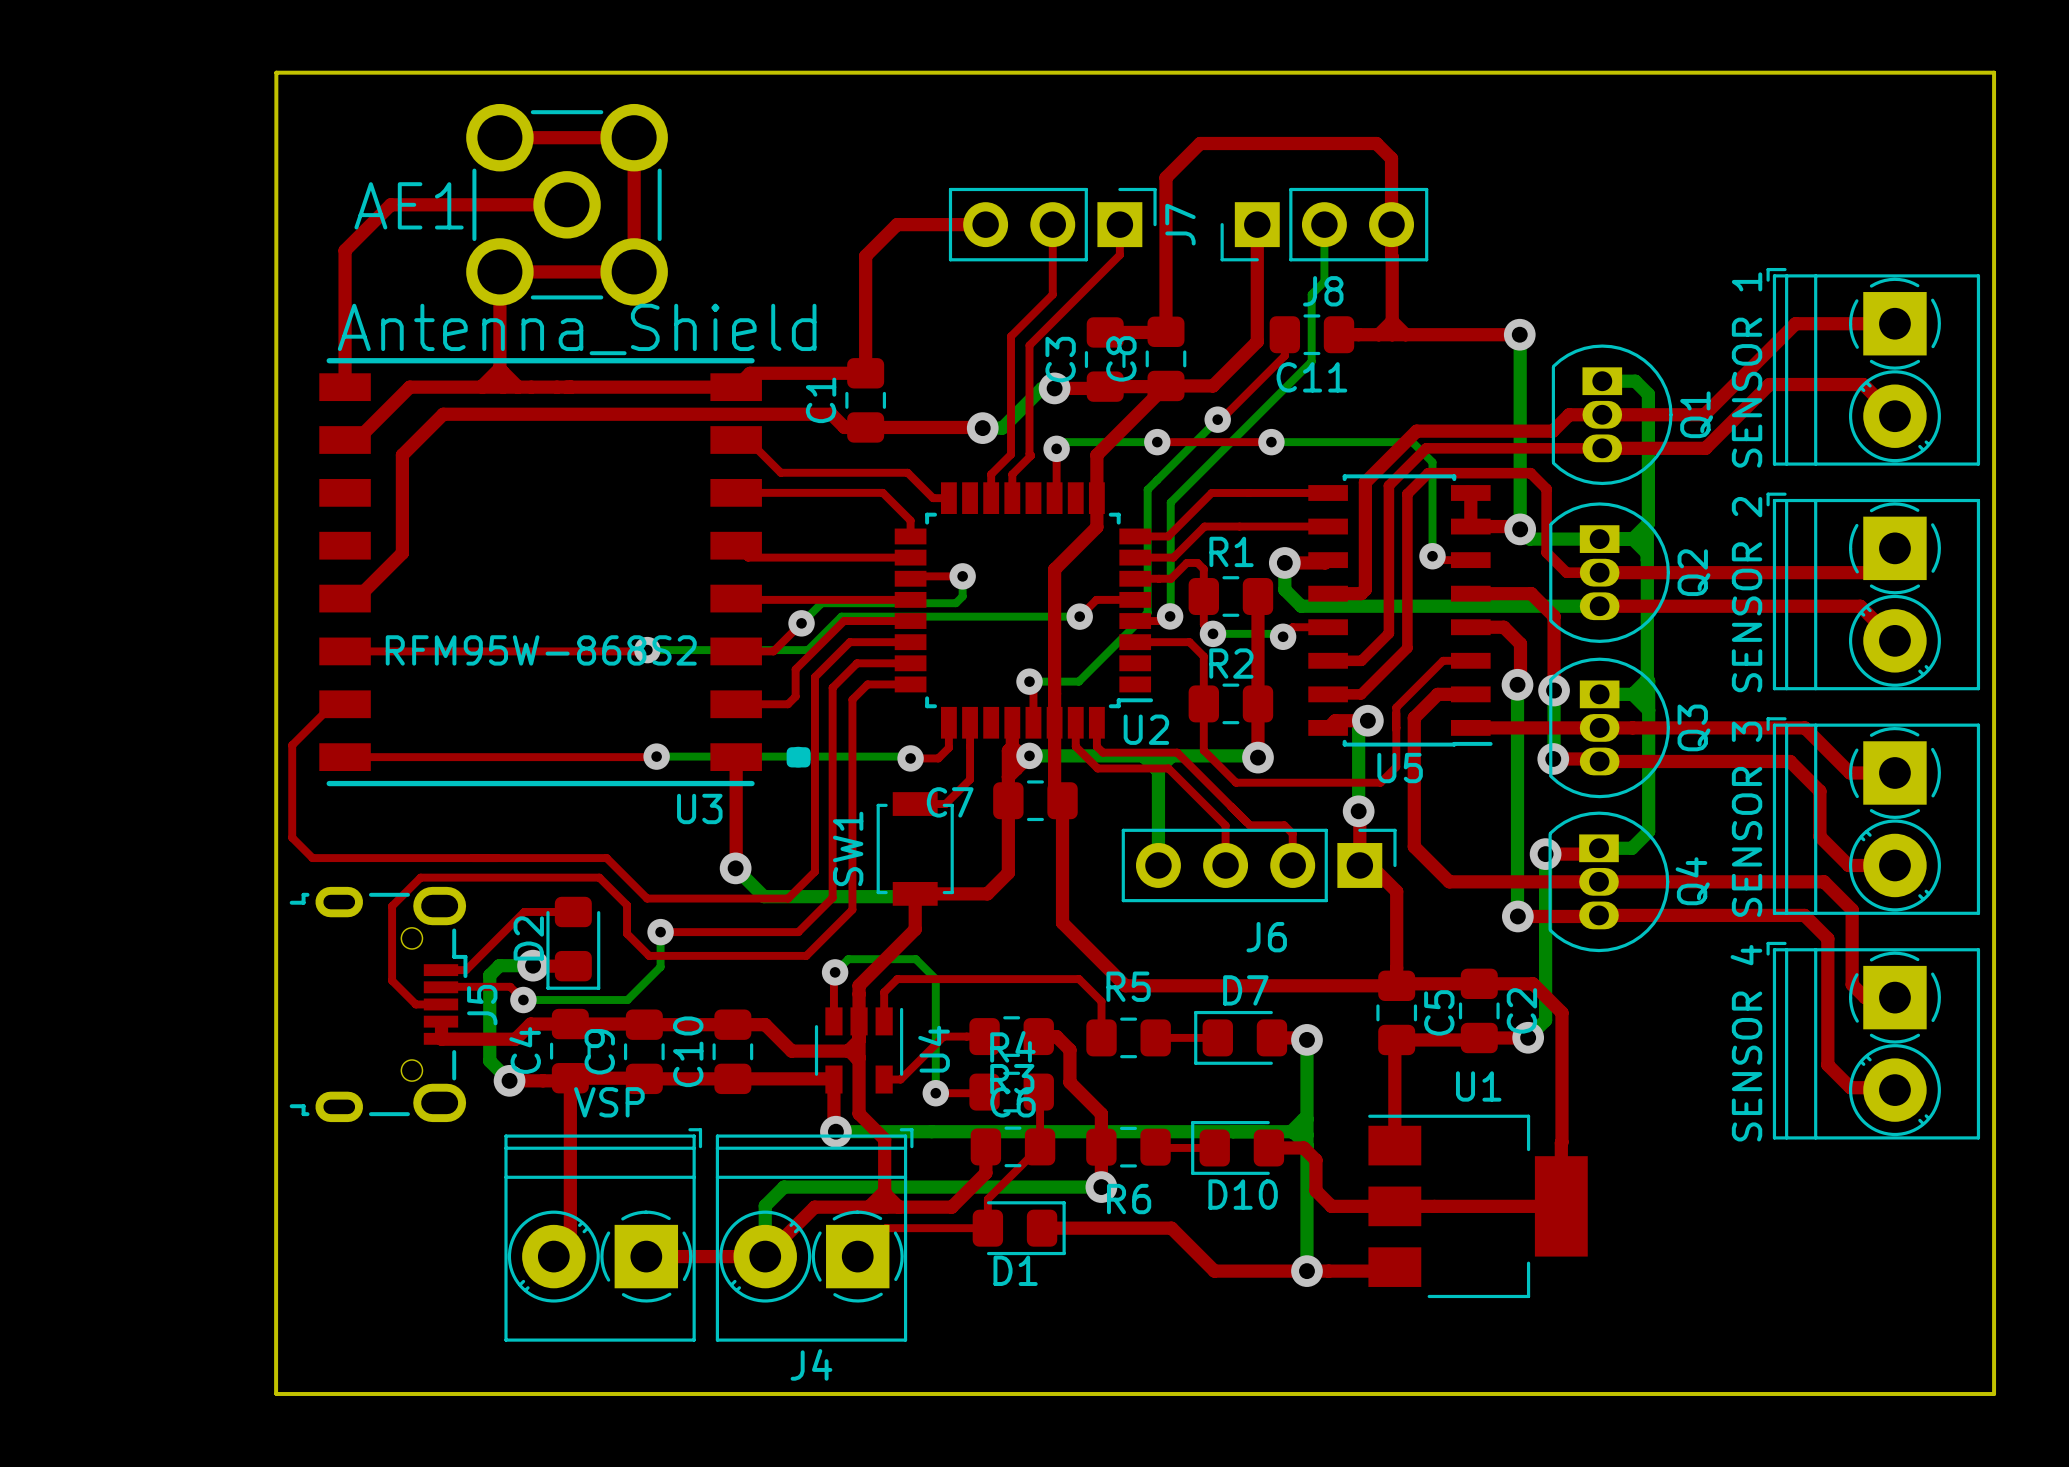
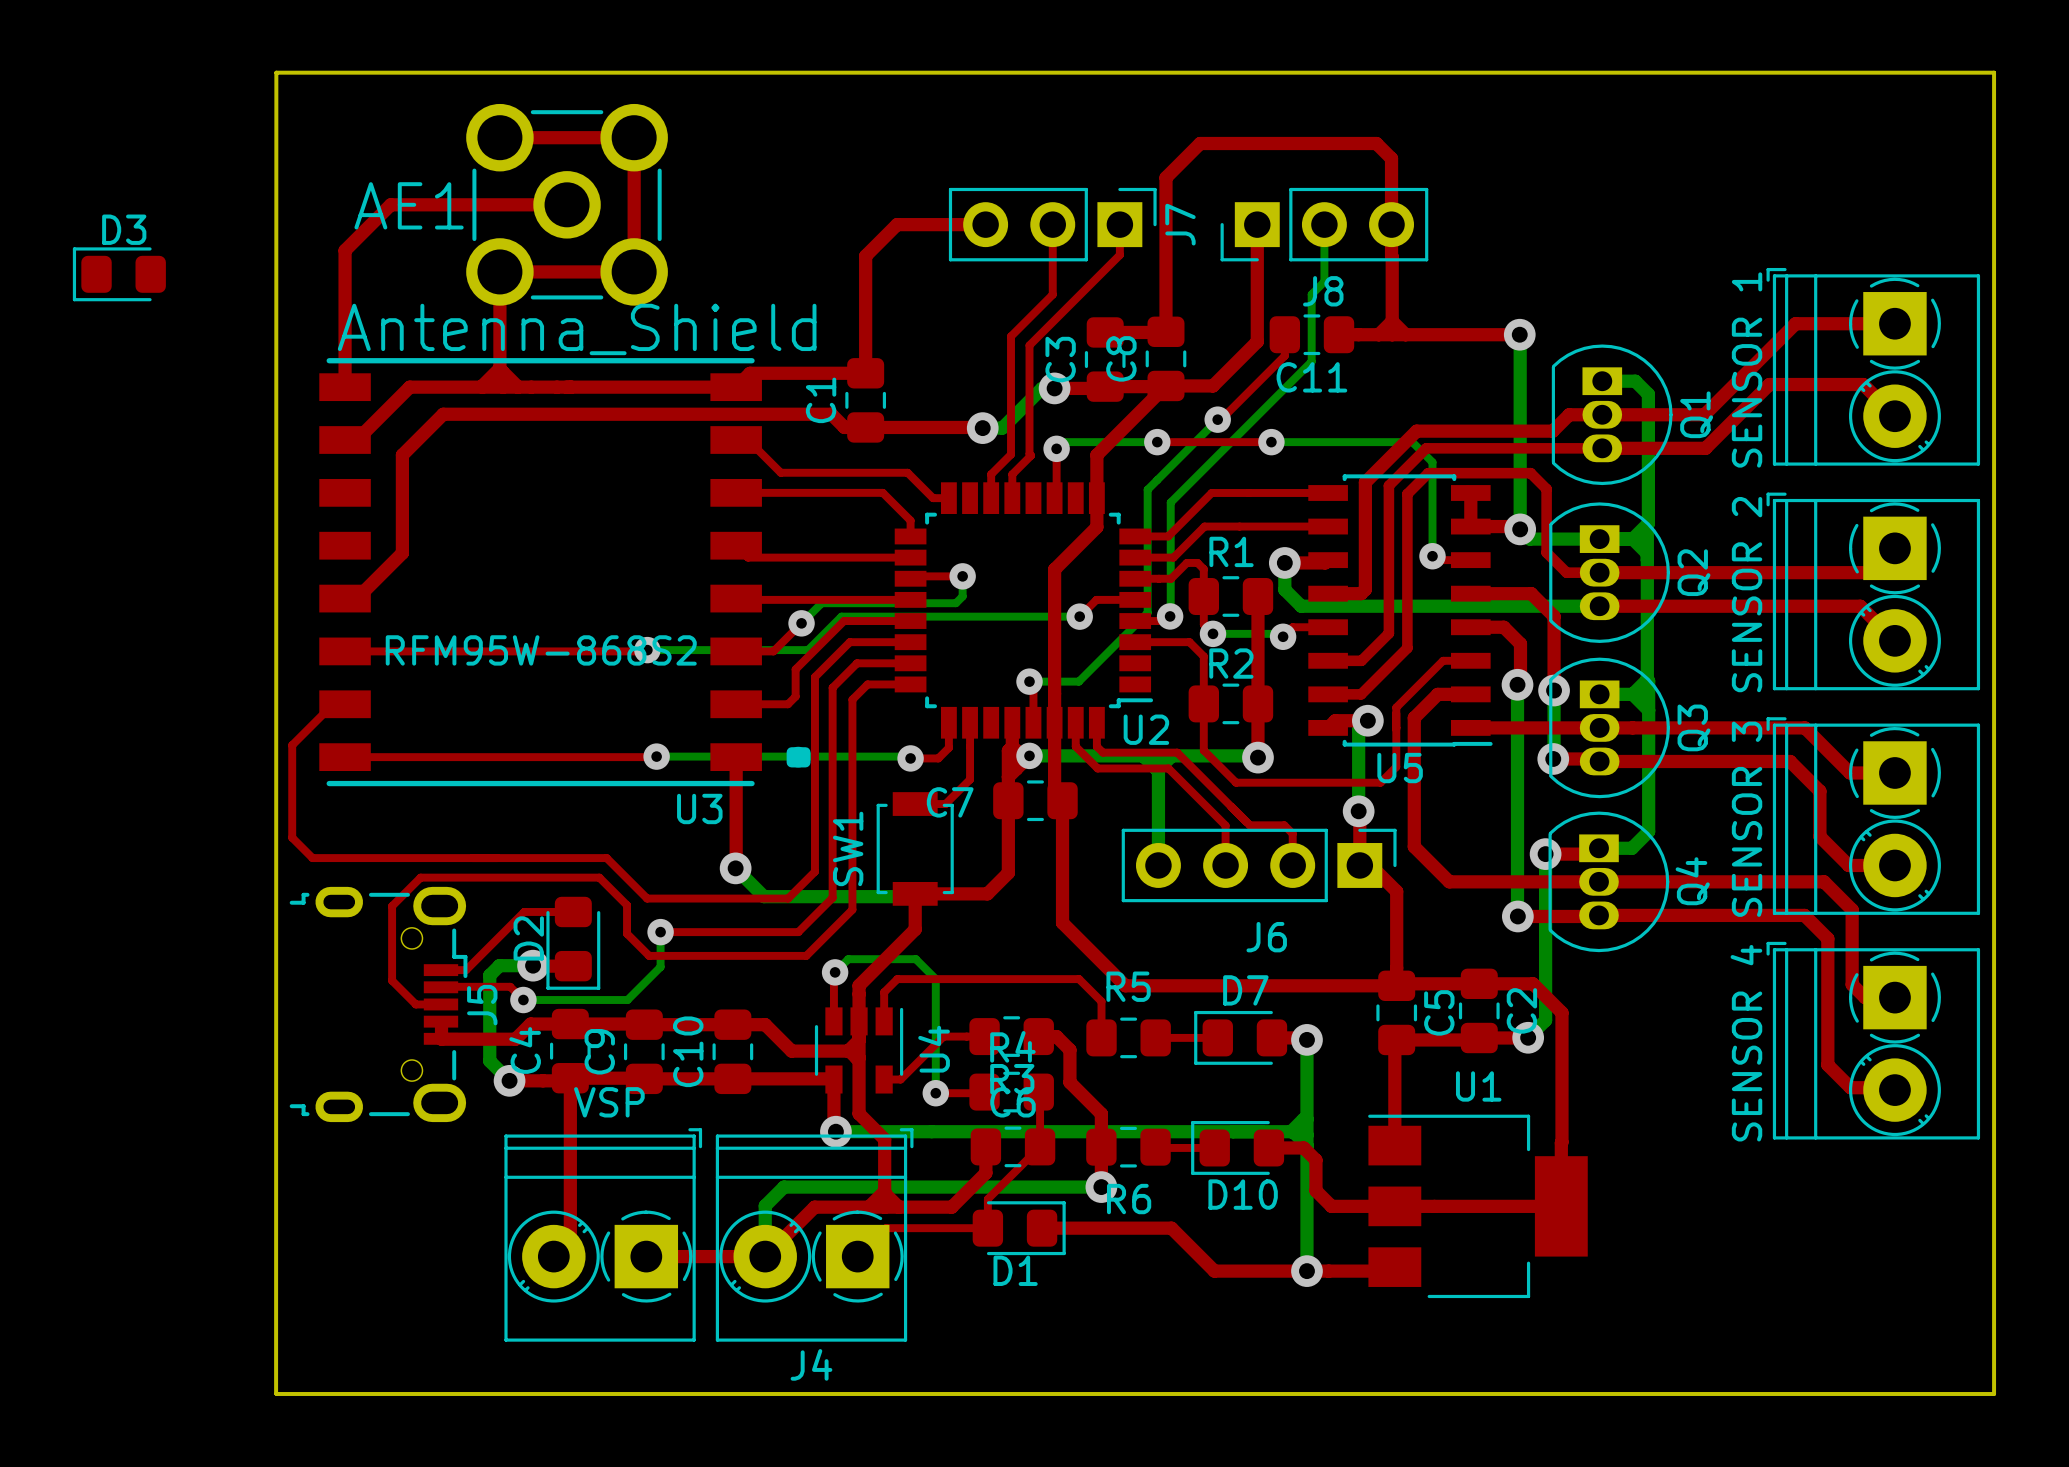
D3: none -> (119, 274)

